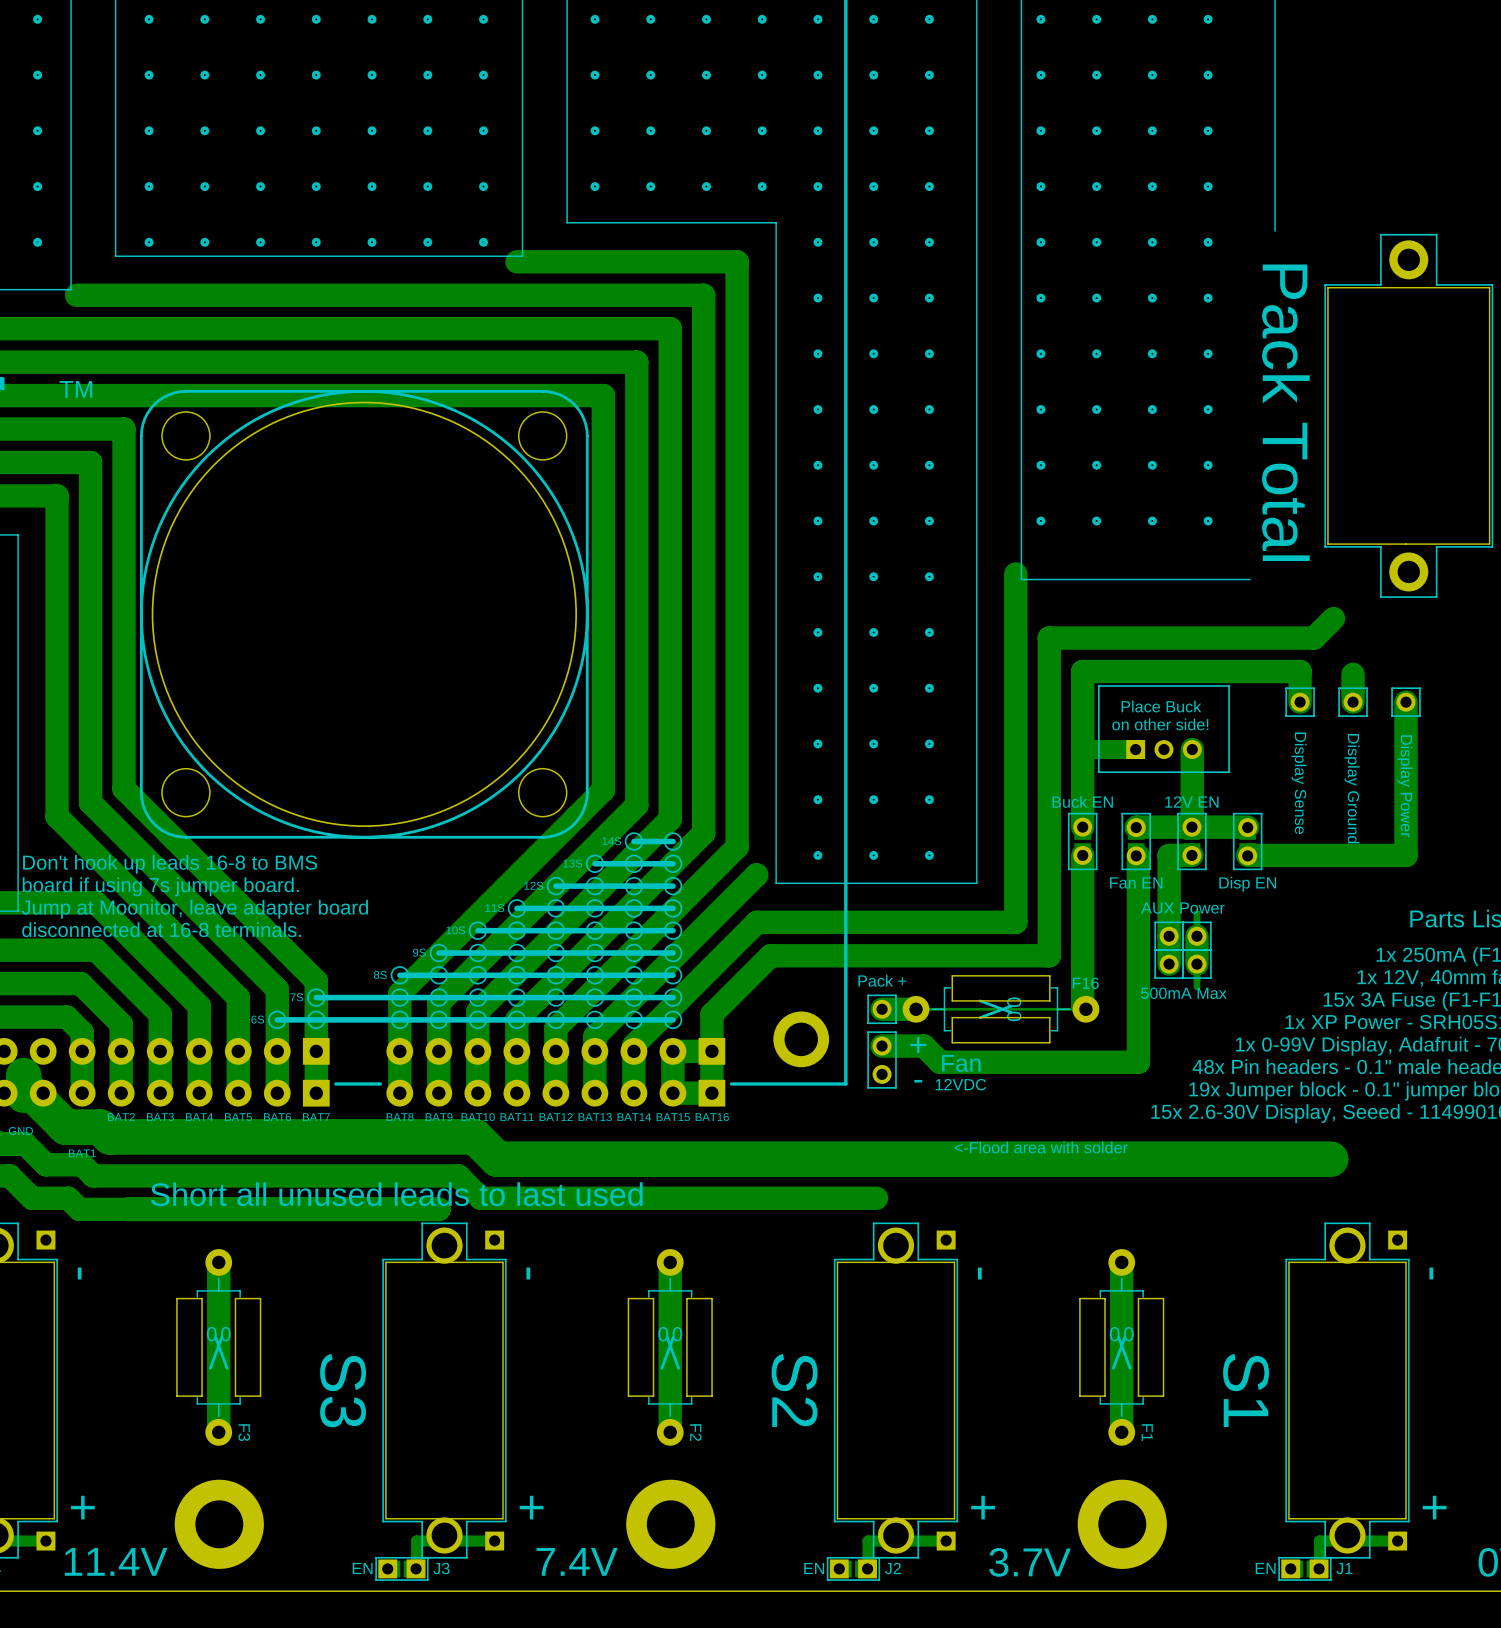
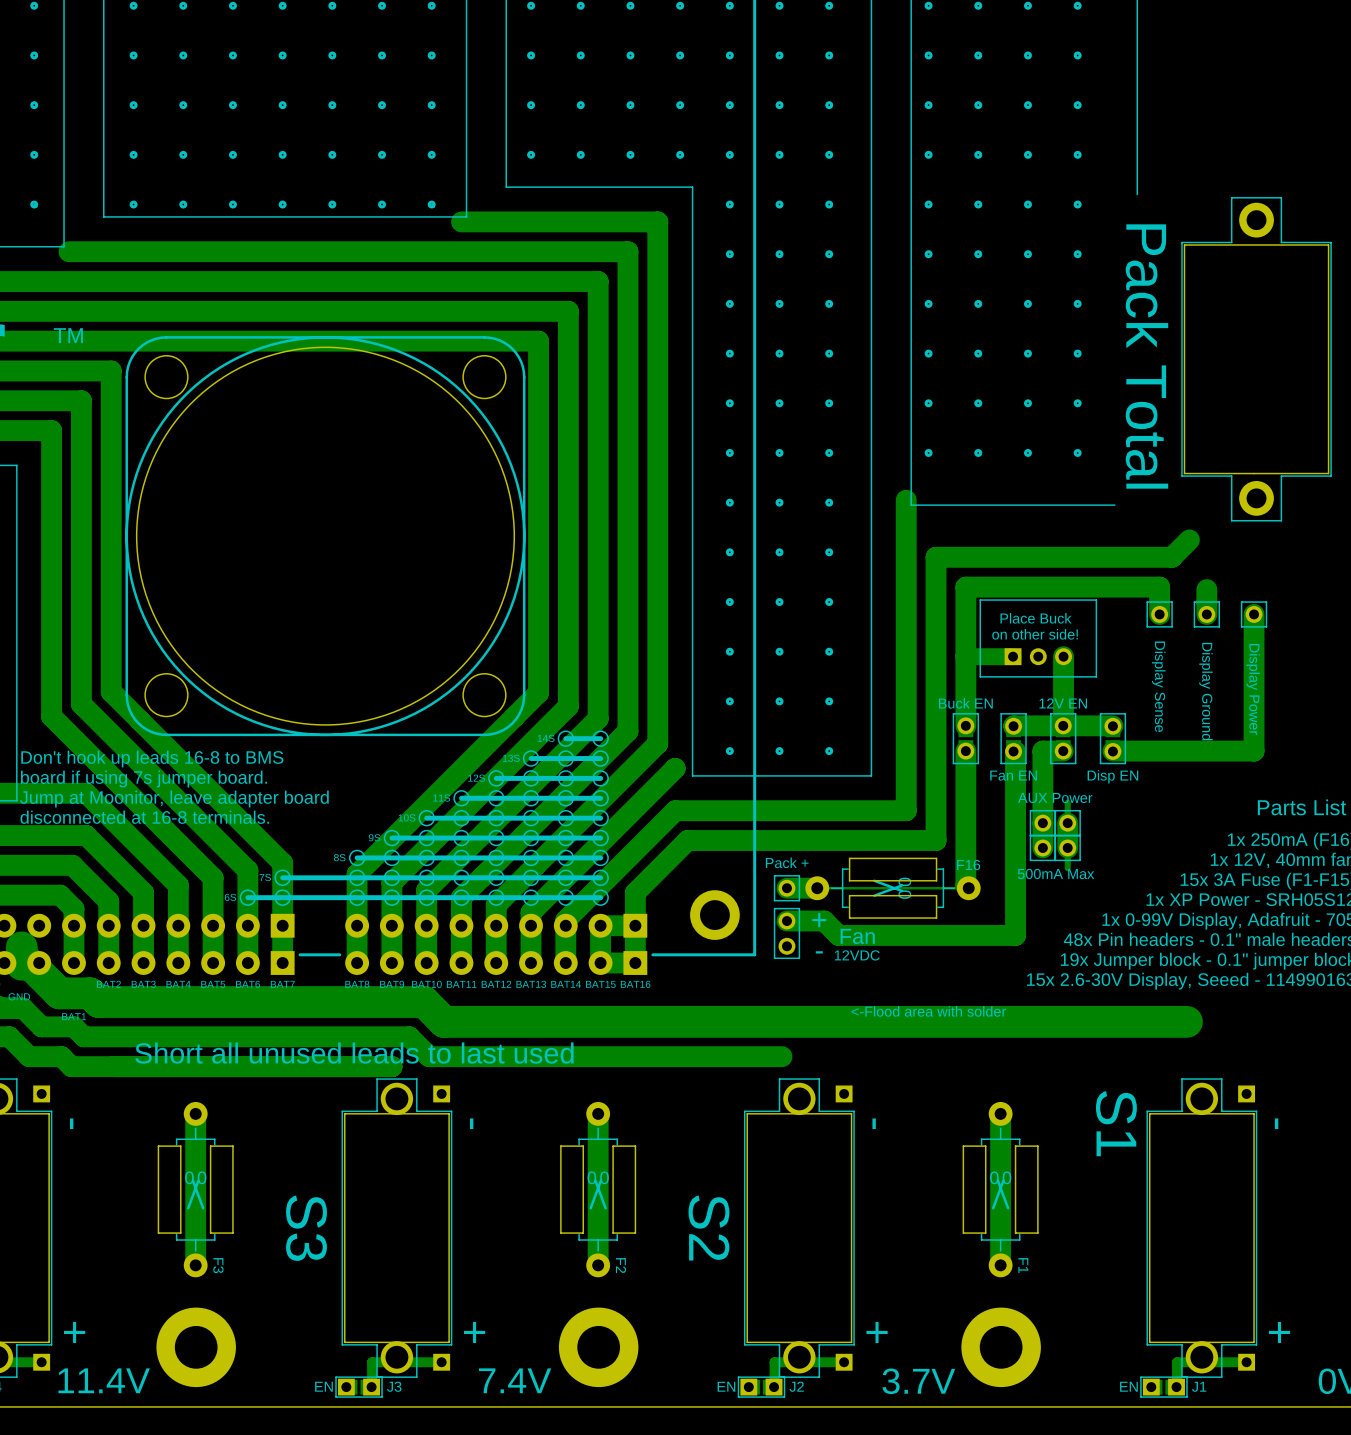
text position: S1 (1246, 1390) -> S1 (1116, 1123)

